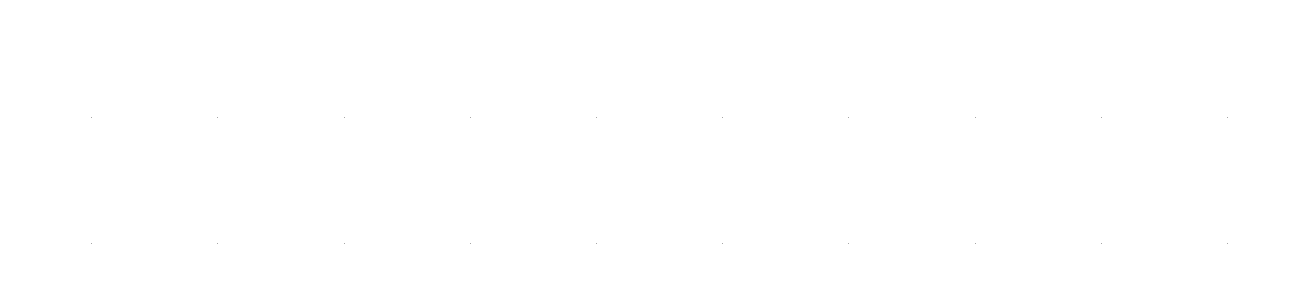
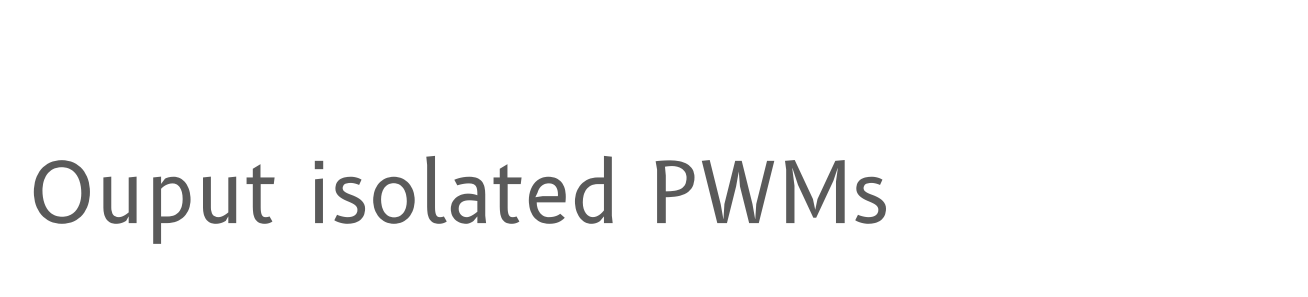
text: none -> Ouput isolated PWMs (459, 199)

